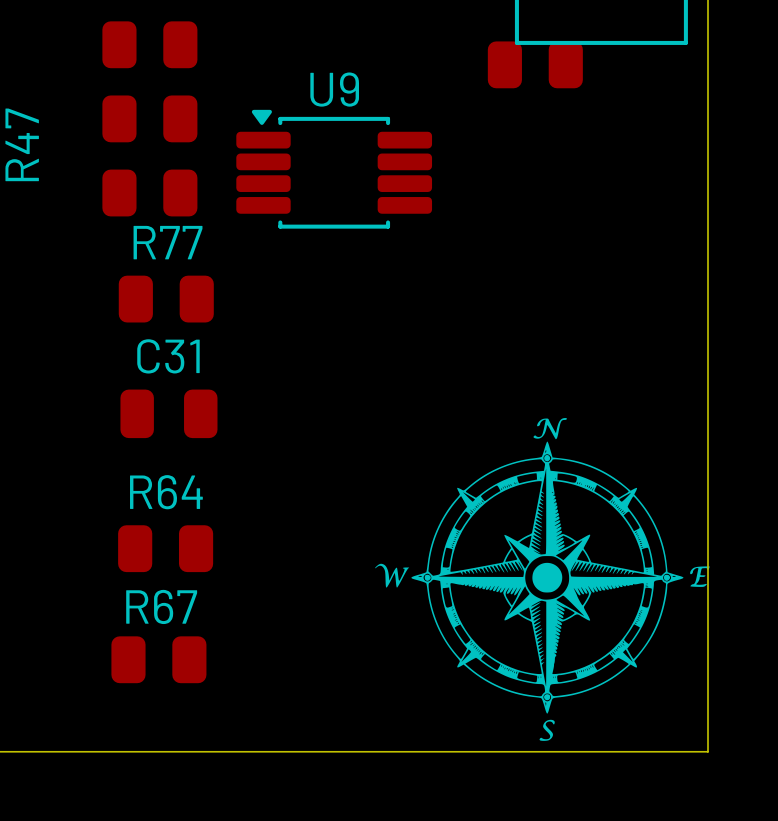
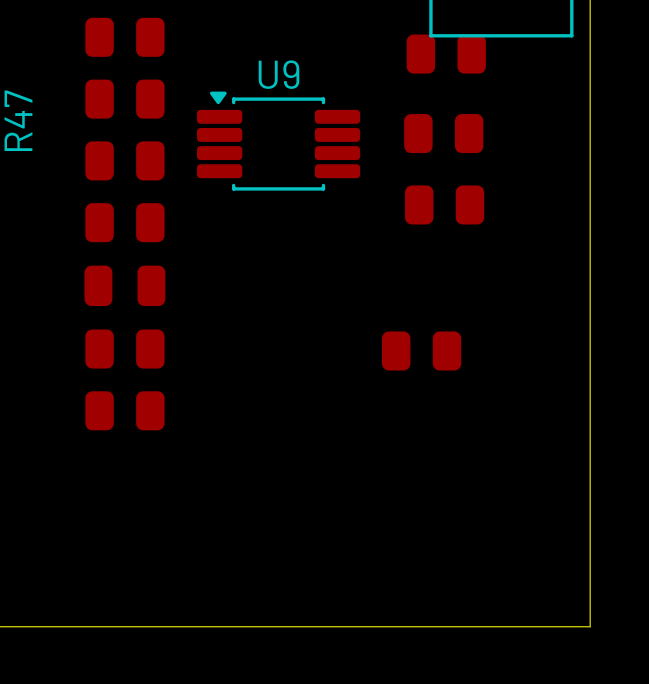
part: none -> (443, 133)
part: none -> (444, 204)
part: none -> (124, 222)
R77: (166, 299) -> none
part: none -> (124, 285)
C31: (168, 413) -> none
part: none -> (124, 349)
drawing: [375, 418, 710, 741] -> none
part: none -> (421, 350)
part: none -> (124, 410)
R64: (165, 548) -> none
R67: (158, 659) -> none

